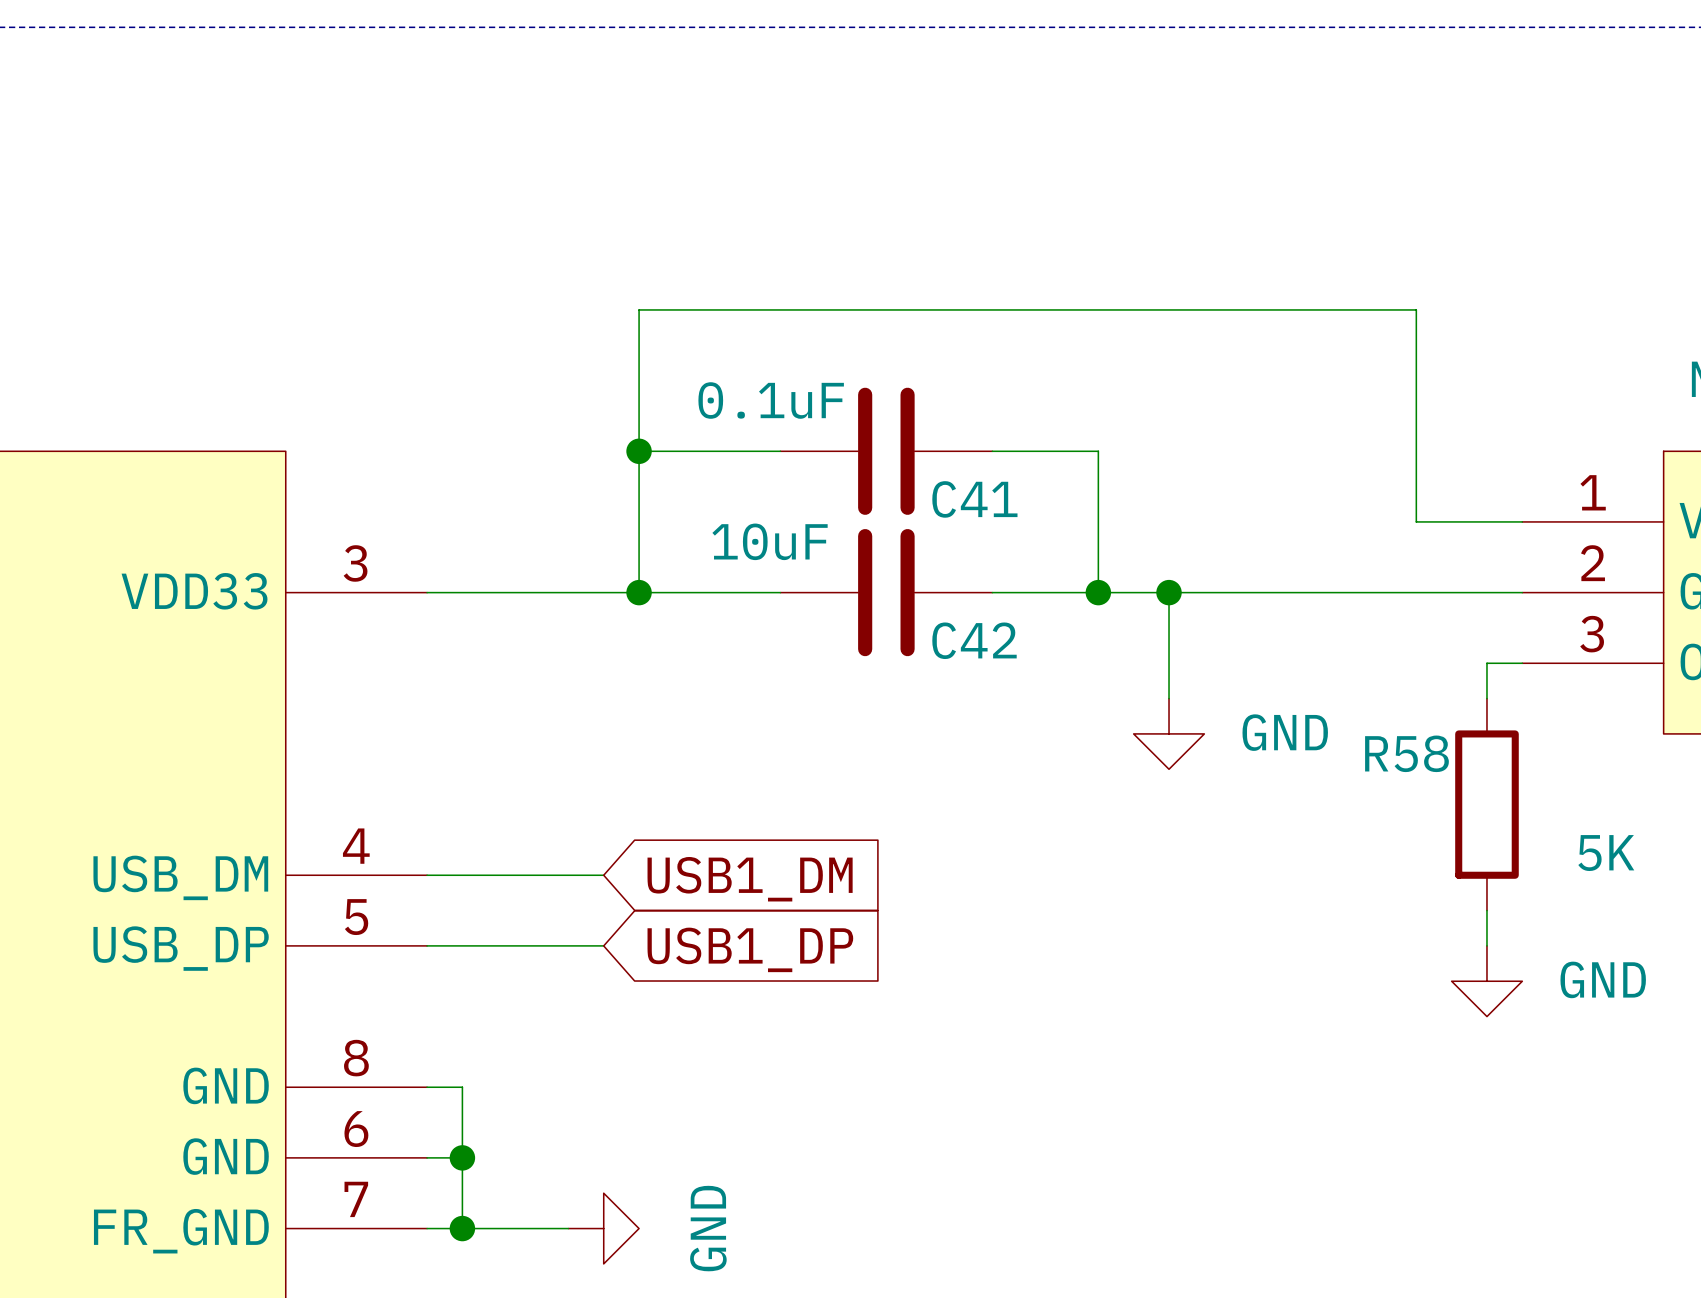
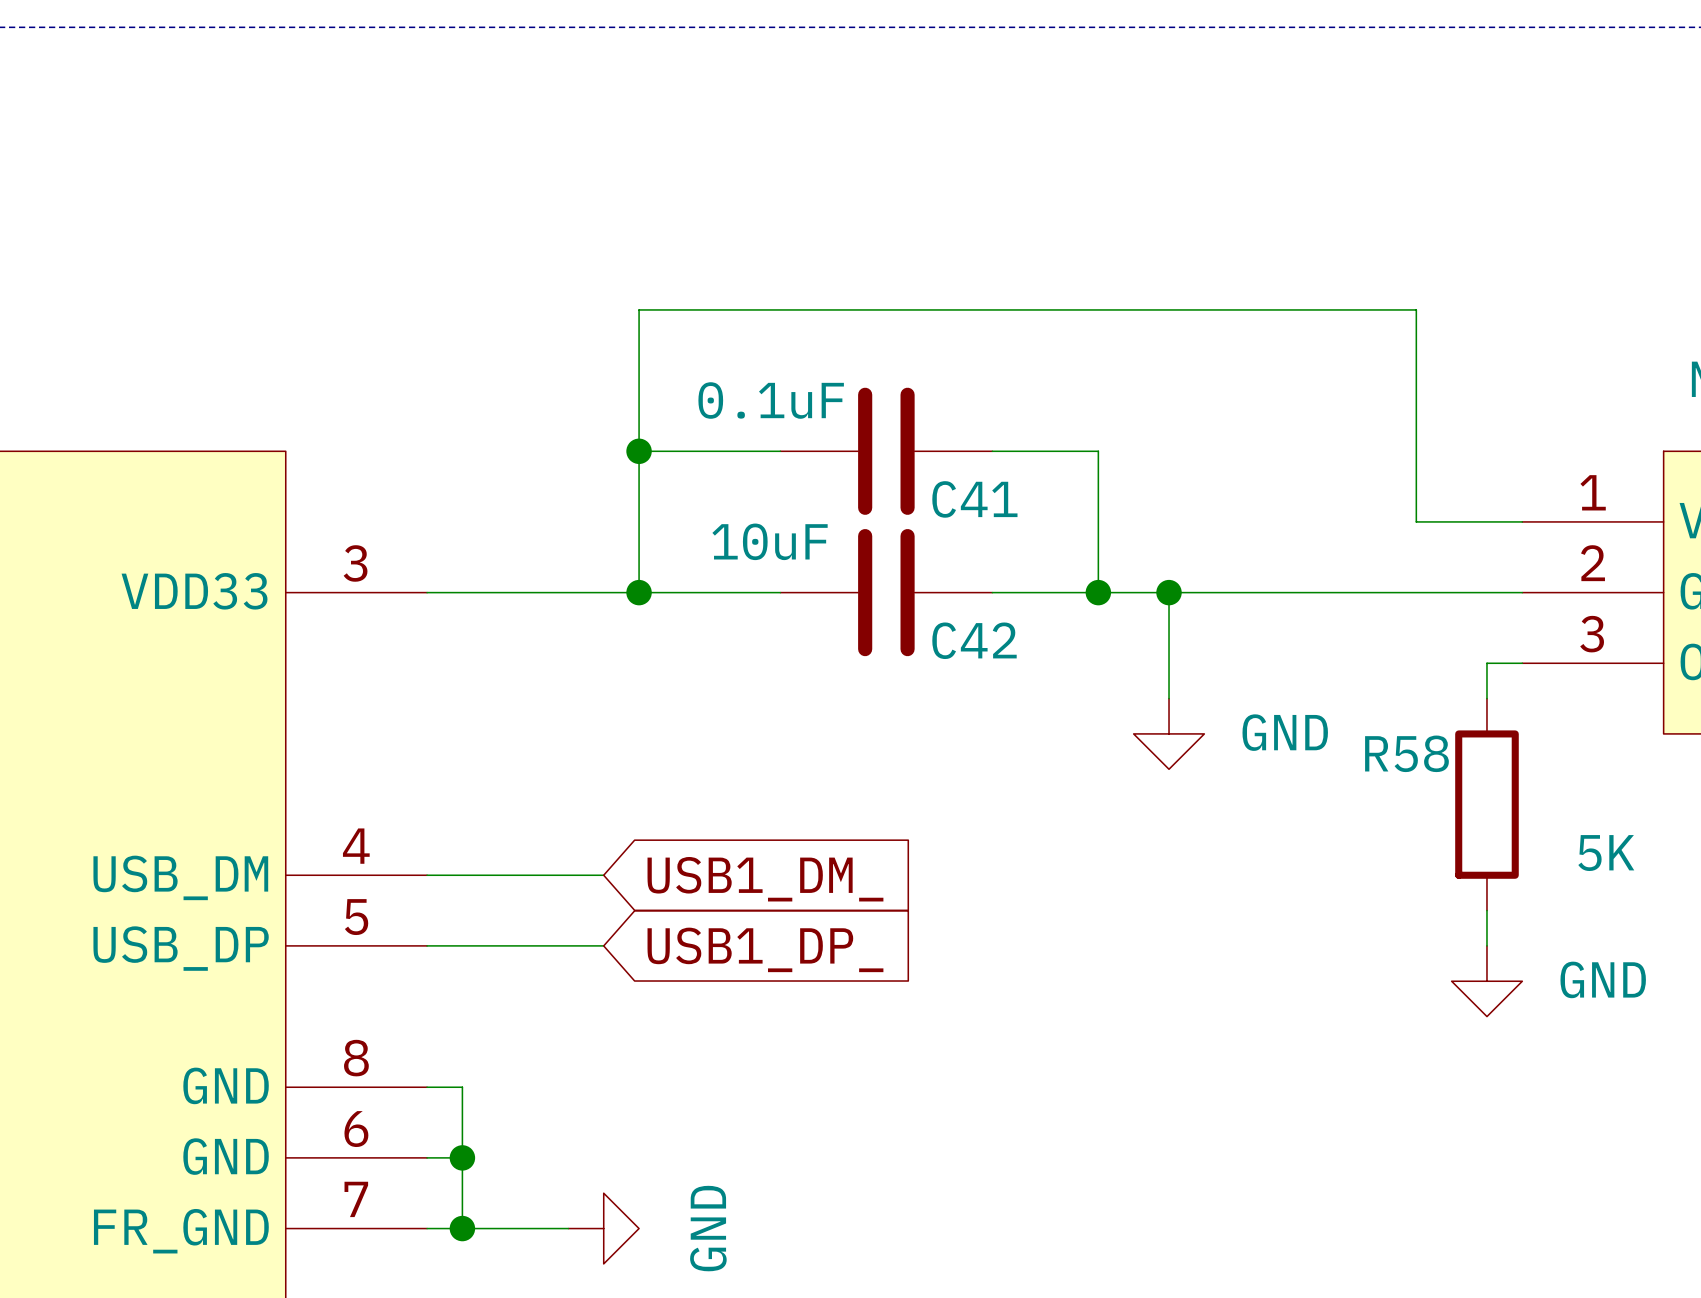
global label: USB1_DM (750, 879) -> USB1_DM_ (765, 879)
global label: USB1_DP (750, 949) -> USB1_DP_ (765, 949)

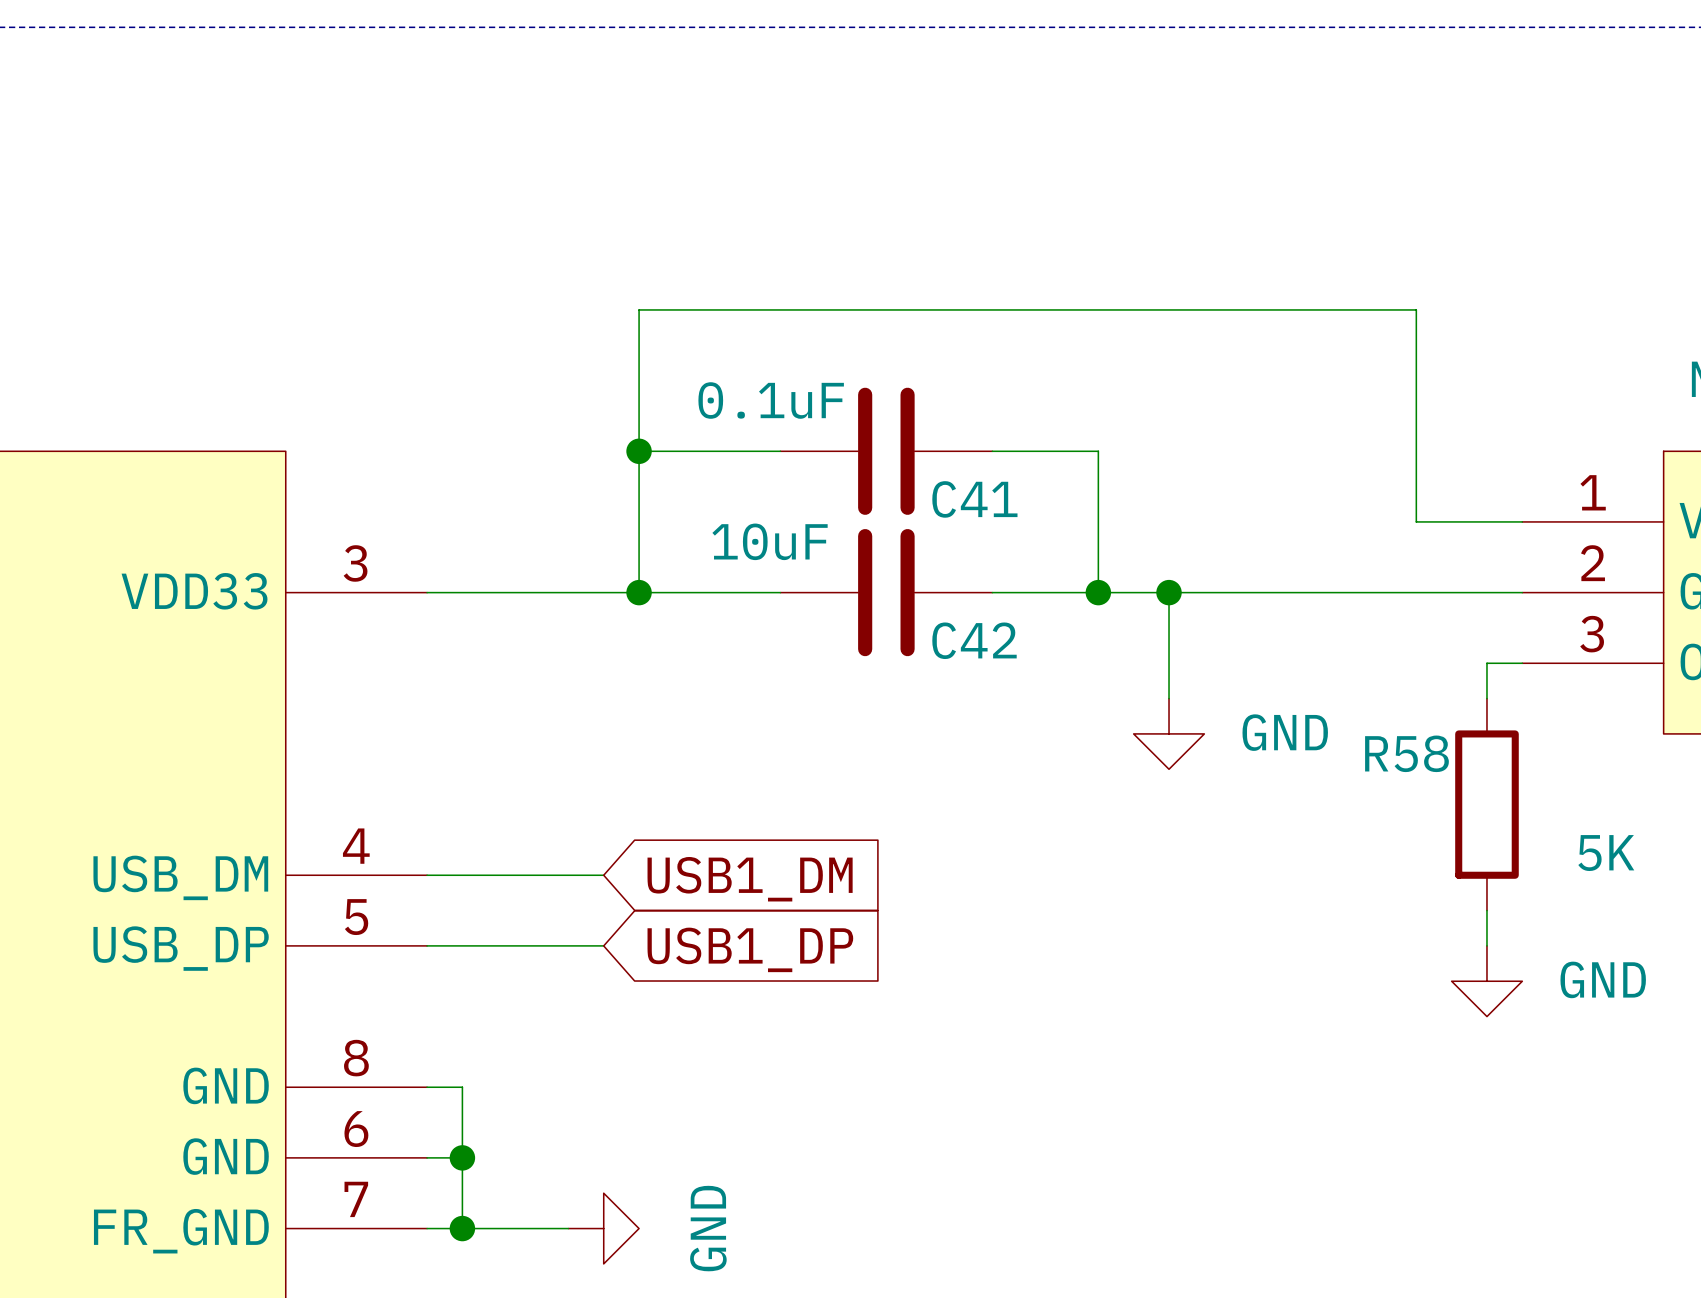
global label: USB1_DM_ (765, 879) -> USB1_DM (750, 879)
global label: USB1_DP_ (765, 949) -> USB1_DP (750, 949)

